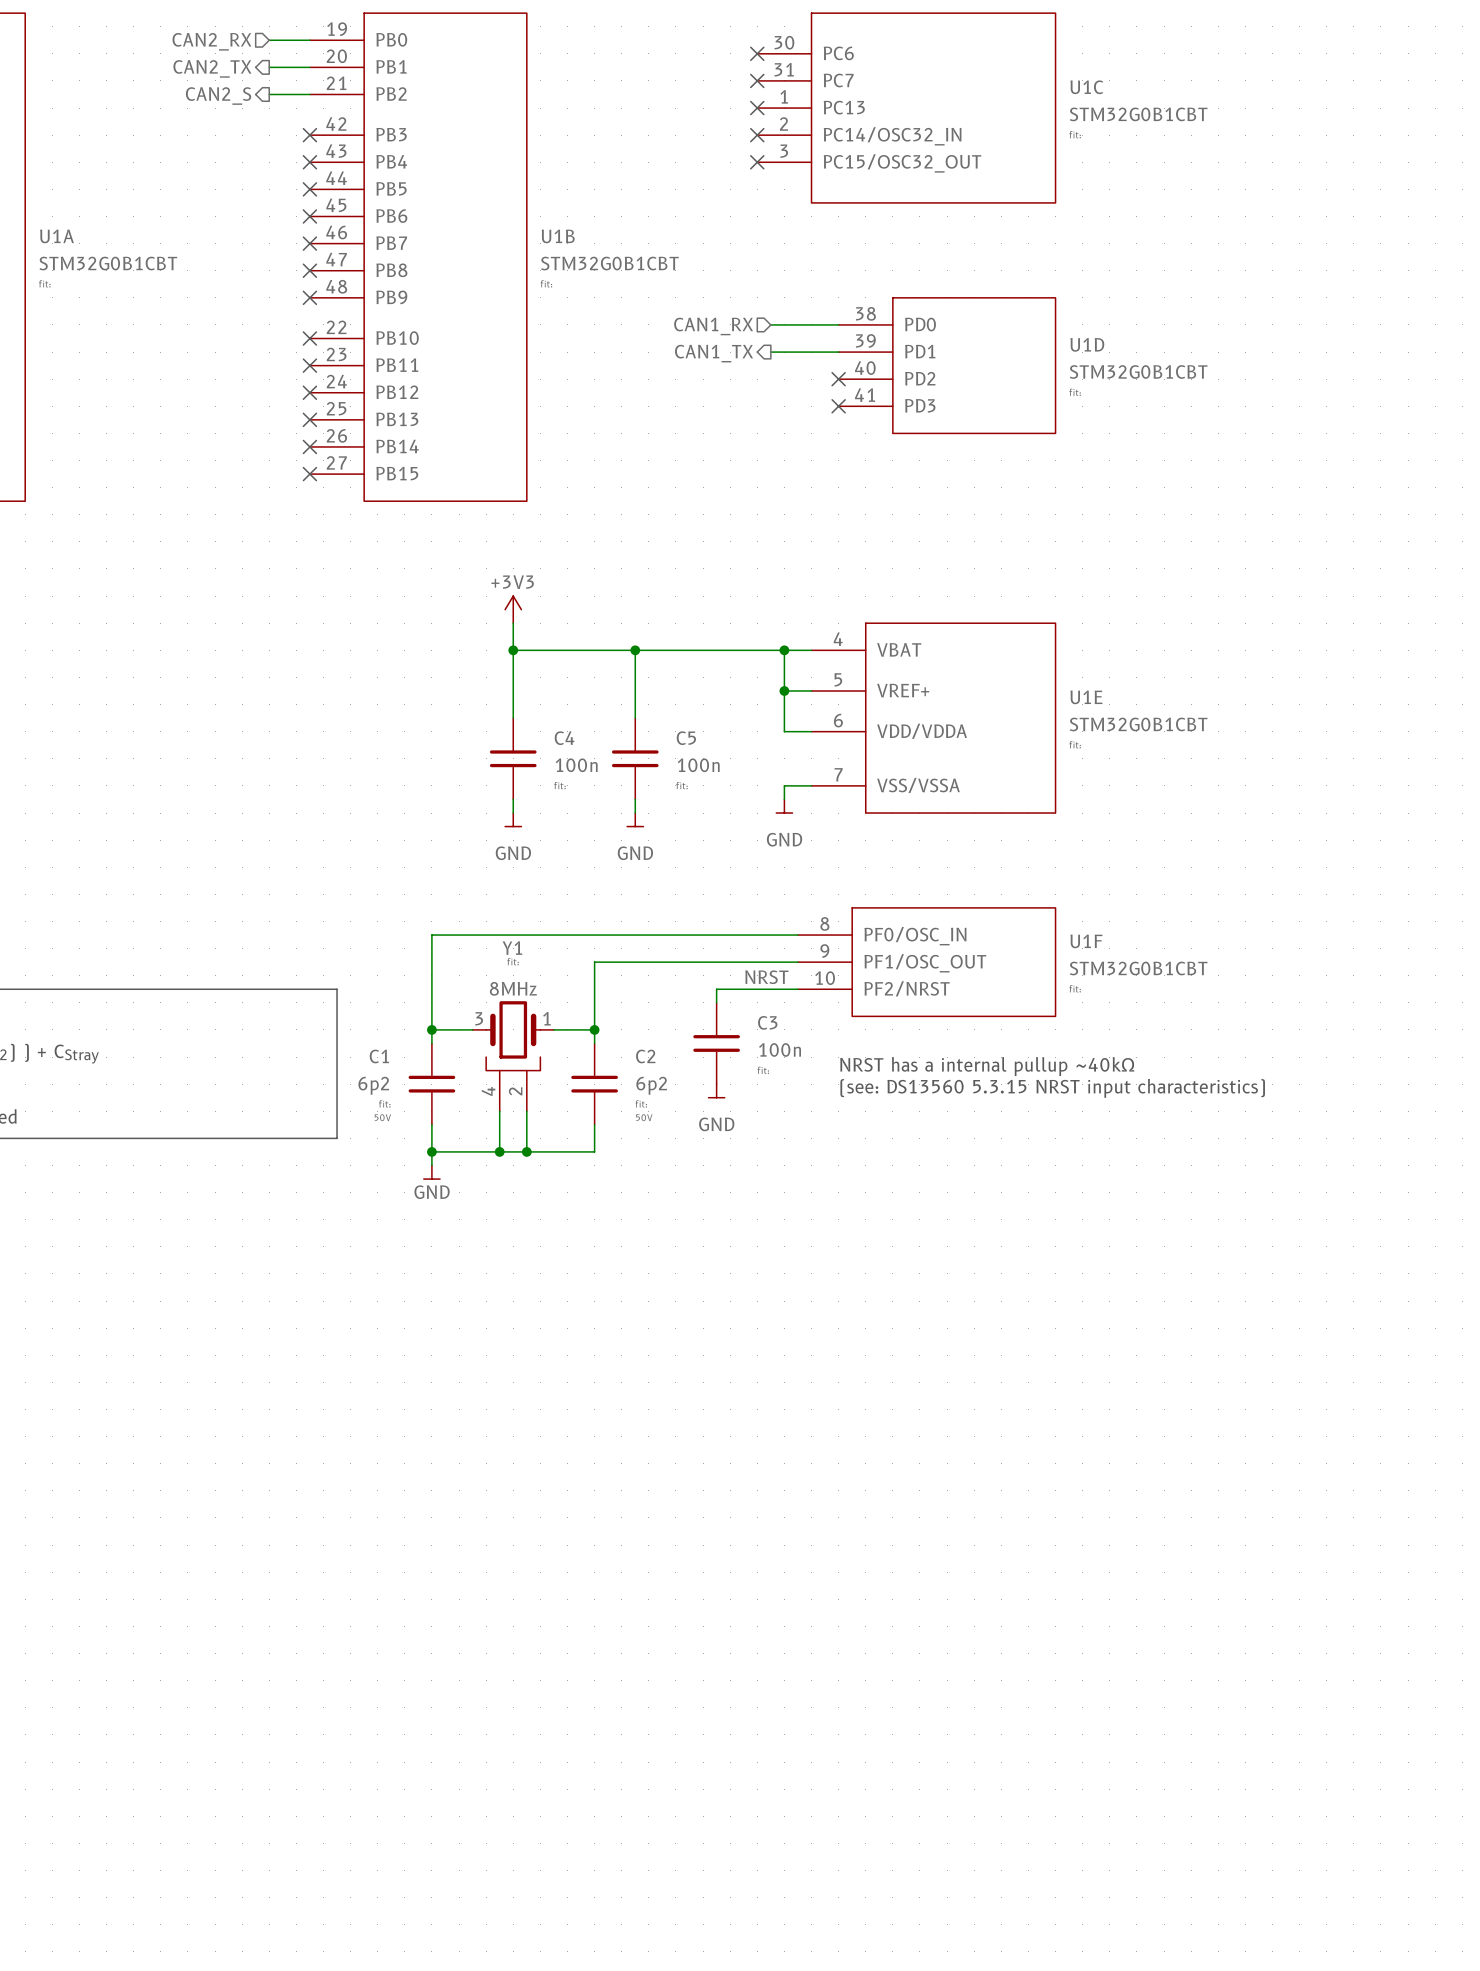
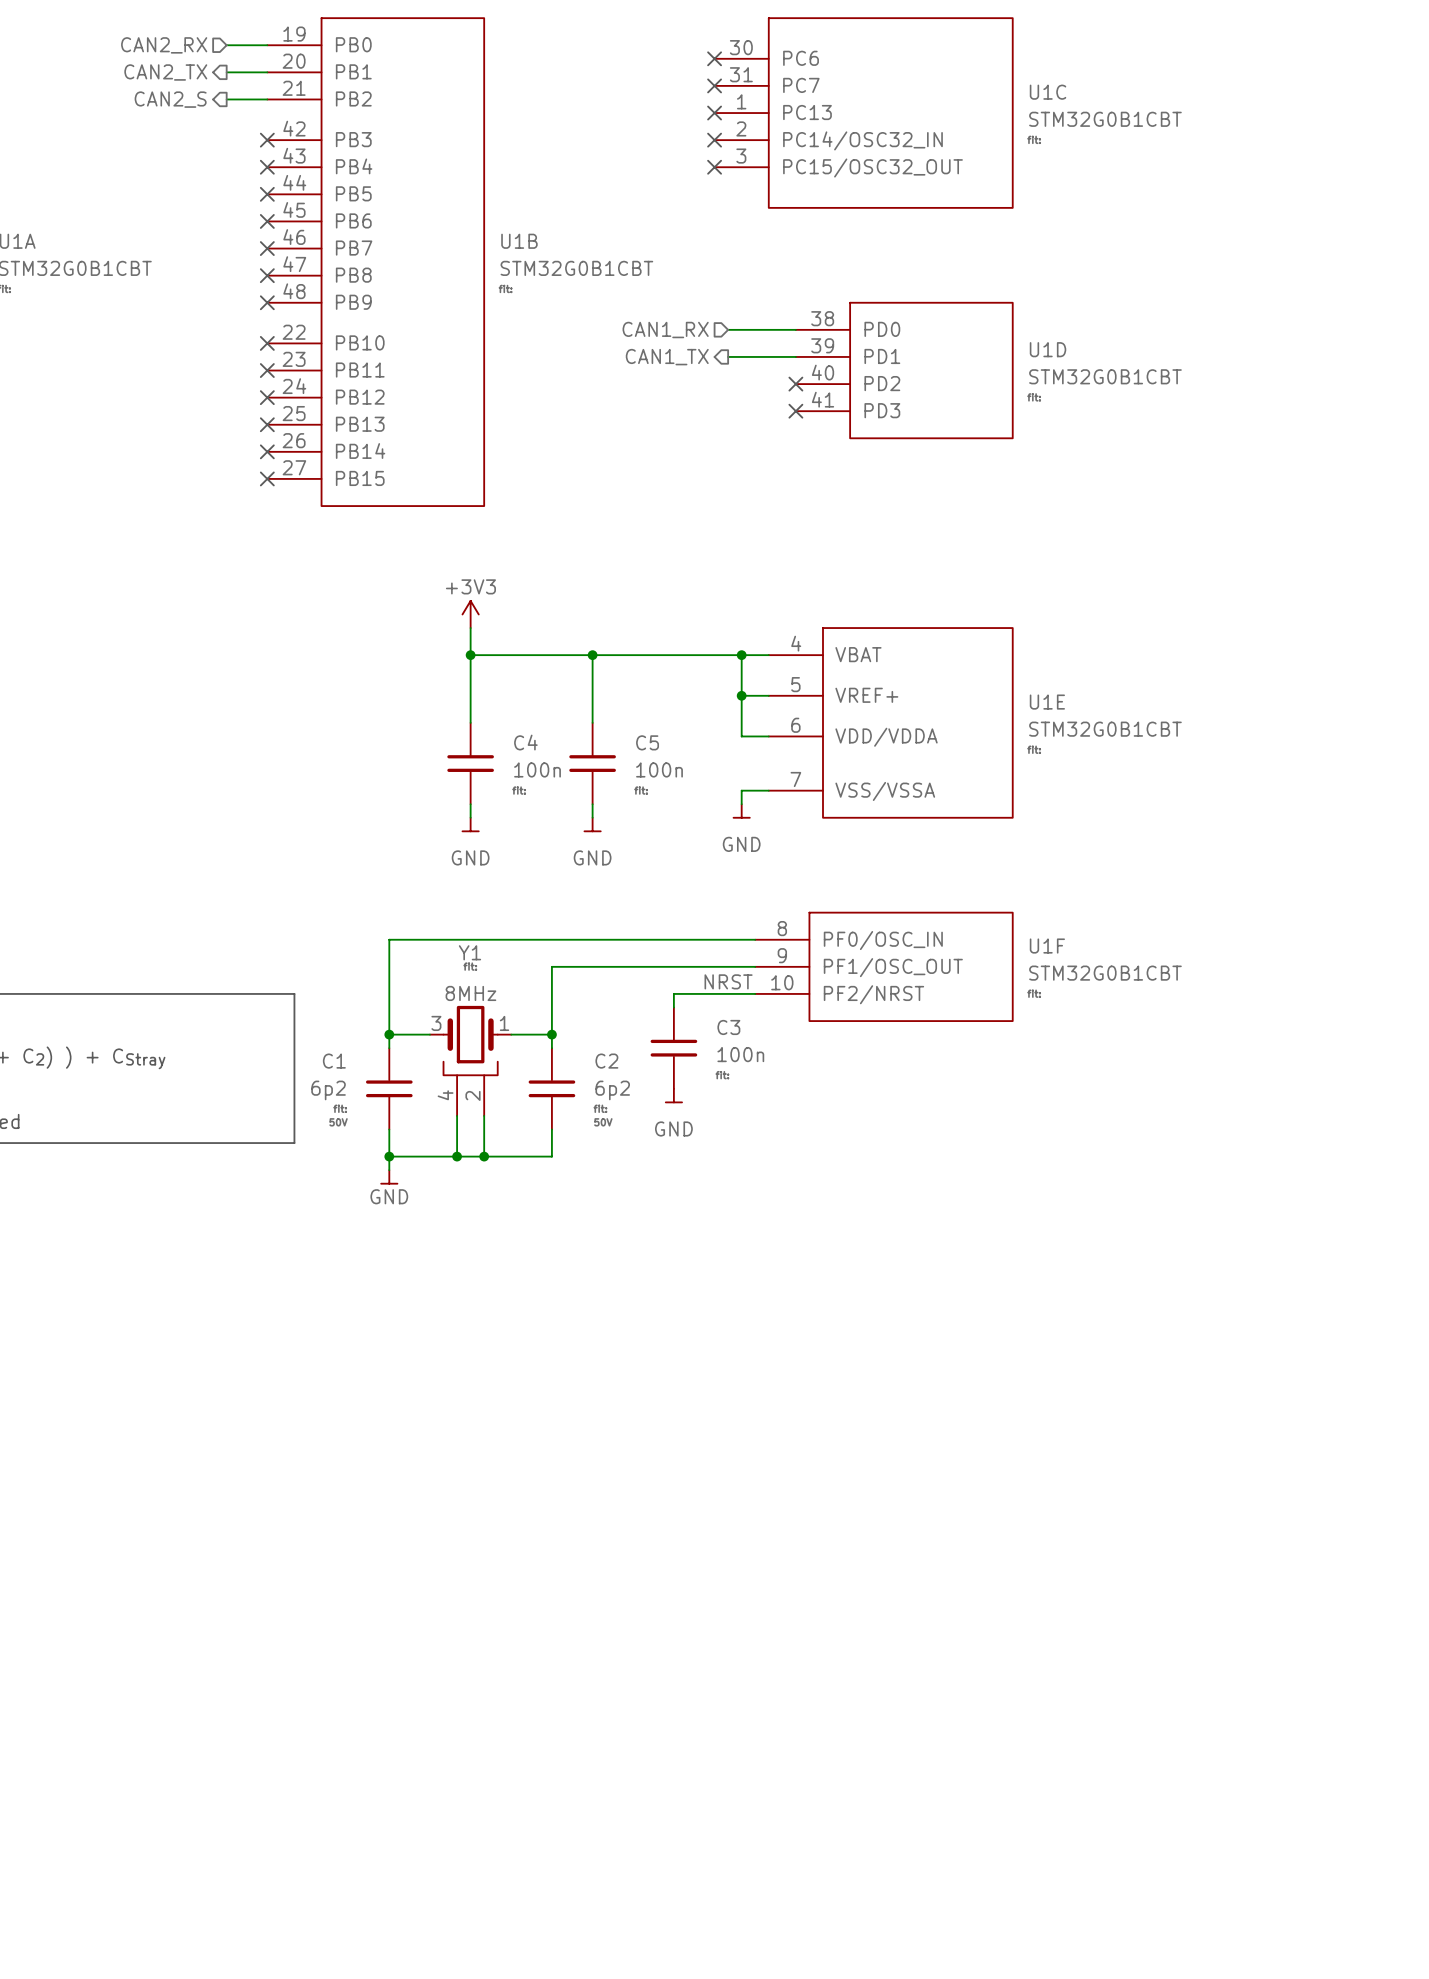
text: NRST has a internal pullup ~40kΩ (987, 1066) -> none
text: (see: DS13560 5.3.15 NRST input characteristics) (1052, 1088) -> none

